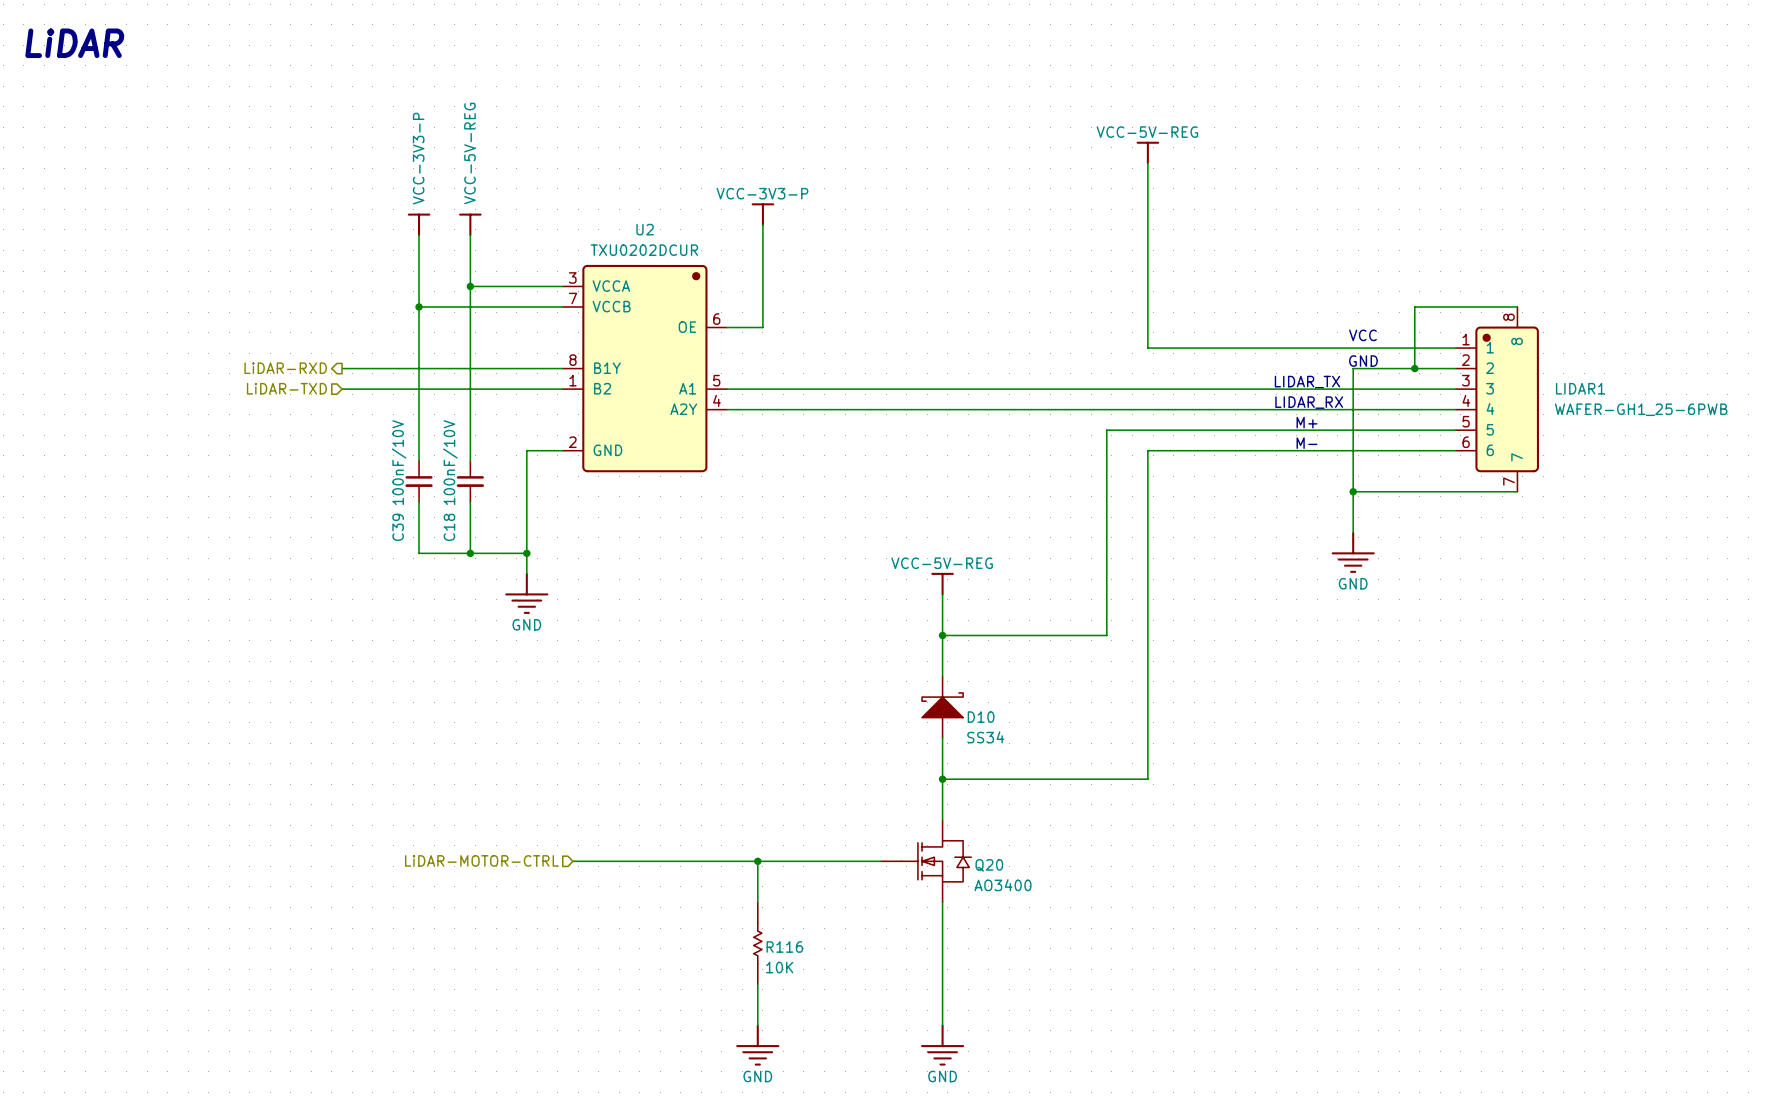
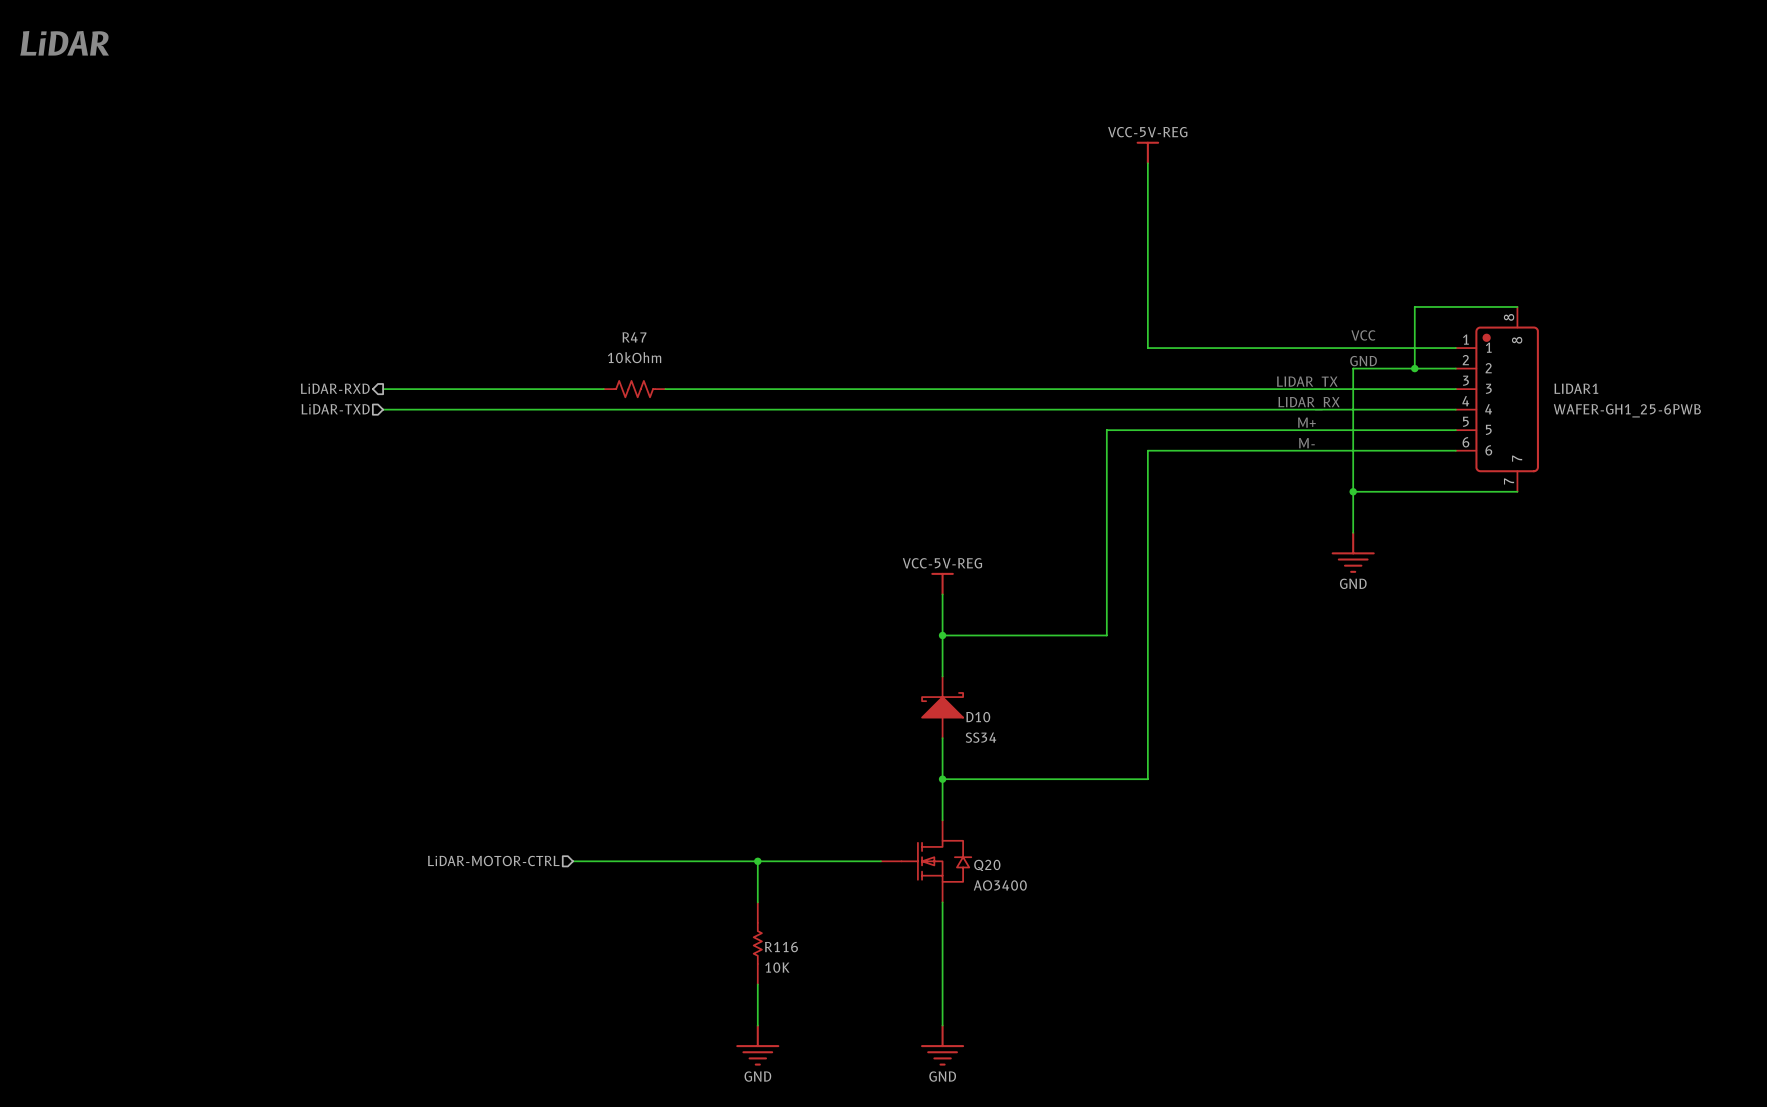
power symbol: VCC-3V3-P (762, 214) -> none
power symbol: VCC-3V3-P (419, 224) -> none
power symbol: VCC-5V-REG (470, 224) -> none
wire: (762, 224) (762, 327) (727, 327) -> none
wire: (419, 235) (419, 460) -> none
wire: (470, 235) (470, 460) -> none
wire: (470, 286) (562, 286) -> none
junction: (470, 286) -> none
wire: (419, 306) (562, 306) -> none
junction: (419, 306) -> none
hierarchical label position: LiDAR-RXD (285, 368) -> LiDAR-RXD (335, 388)
wire: (342, 368) (562, 368) -> none
U2: TXU0202DCUR (644, 368) -> none
hierarchical label position: LiDAR-TXD (286, 388) -> LiDAR-TXD (335, 409)
wire: (342, 389) (383, 389) -> none
R47: none -> 10kOhm (634, 389)
wire: none -> (383, 409) (727, 409)
wire: (562, 450) (526, 450) (526, 573) -> none
C39: 100nF/10V (419, 481) -> none
C18: 100nF/10V (470, 481) -> none
wire: (419, 502) (419, 553) (526, 553) -> none
wire: (470, 502) (470, 553) -> none
junction: (470, 553) -> none
junction: (526, 553) -> none
power symbol: GND (526, 593) -> none

